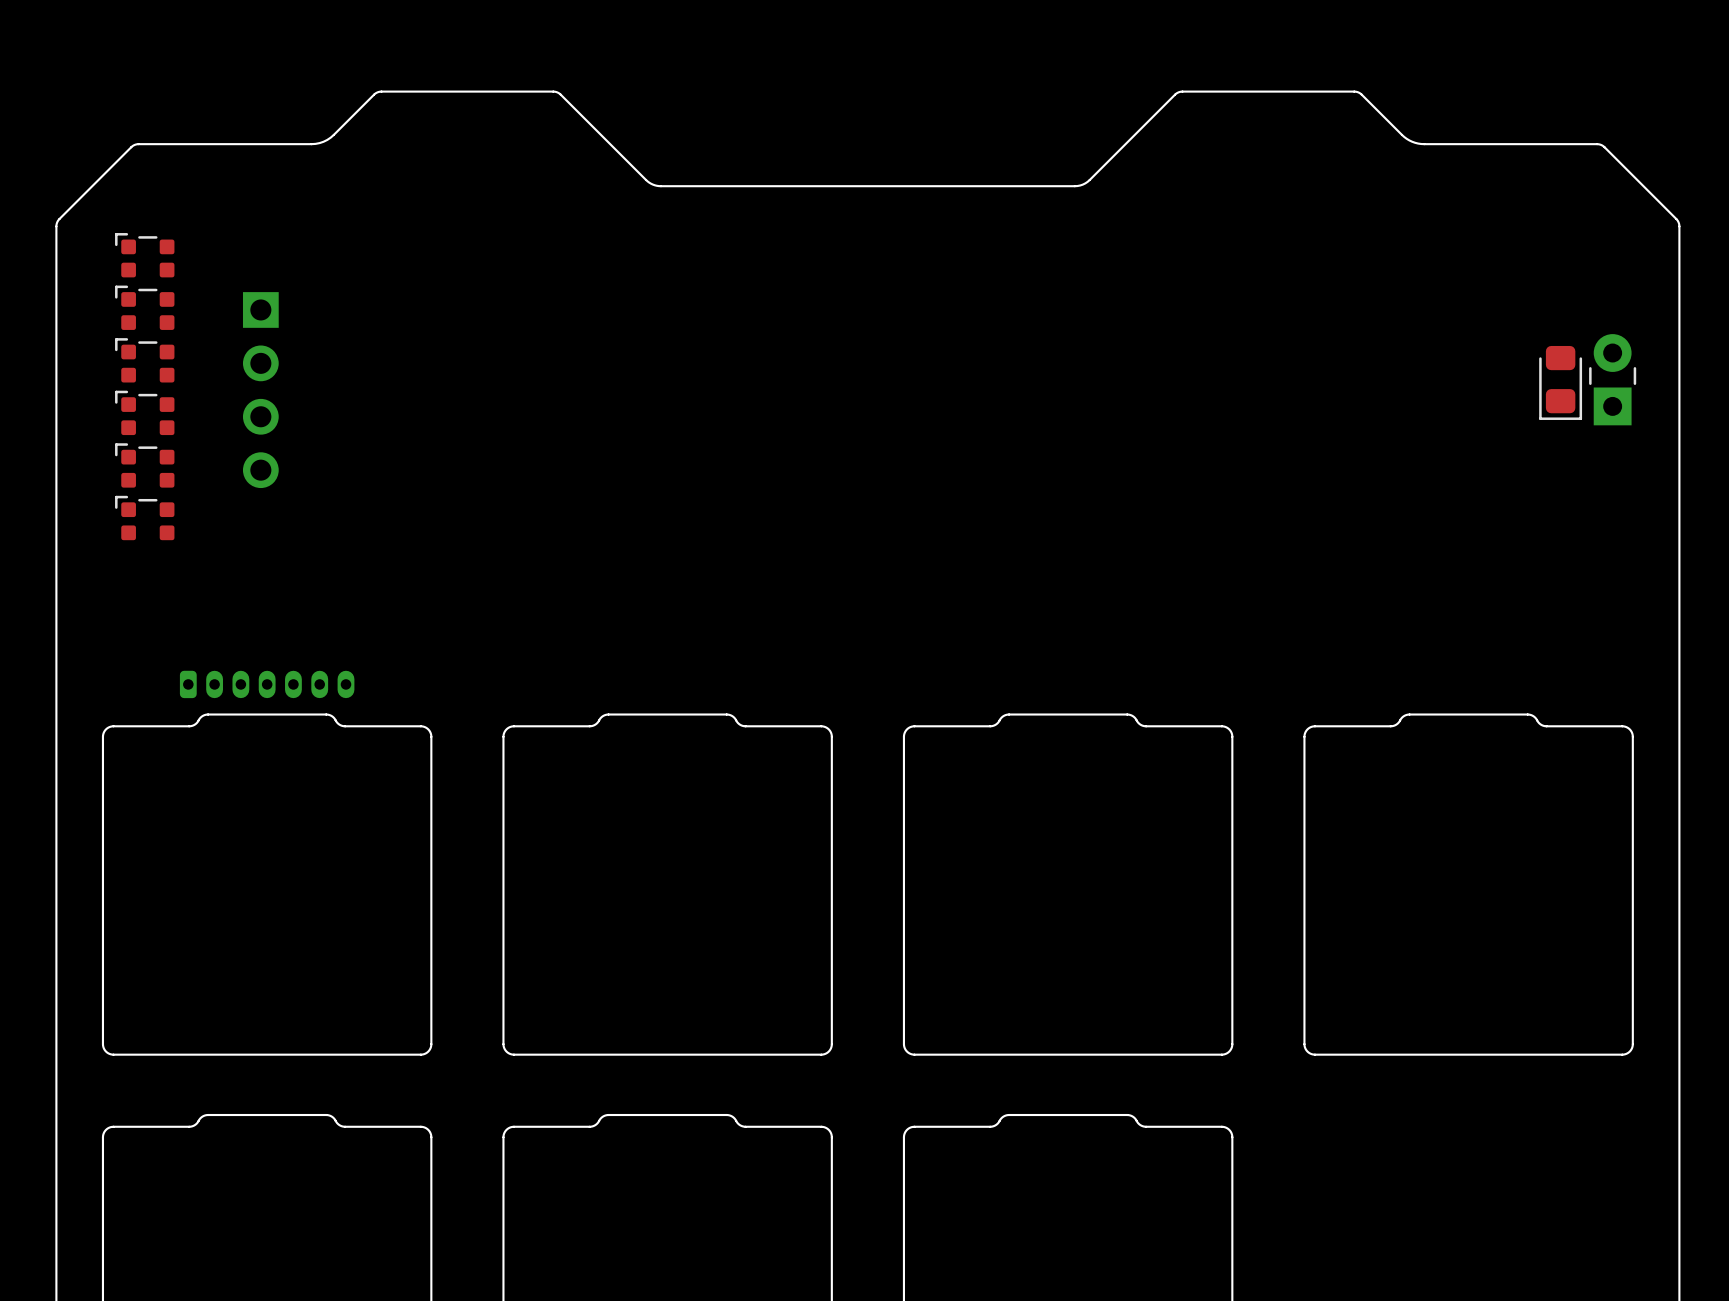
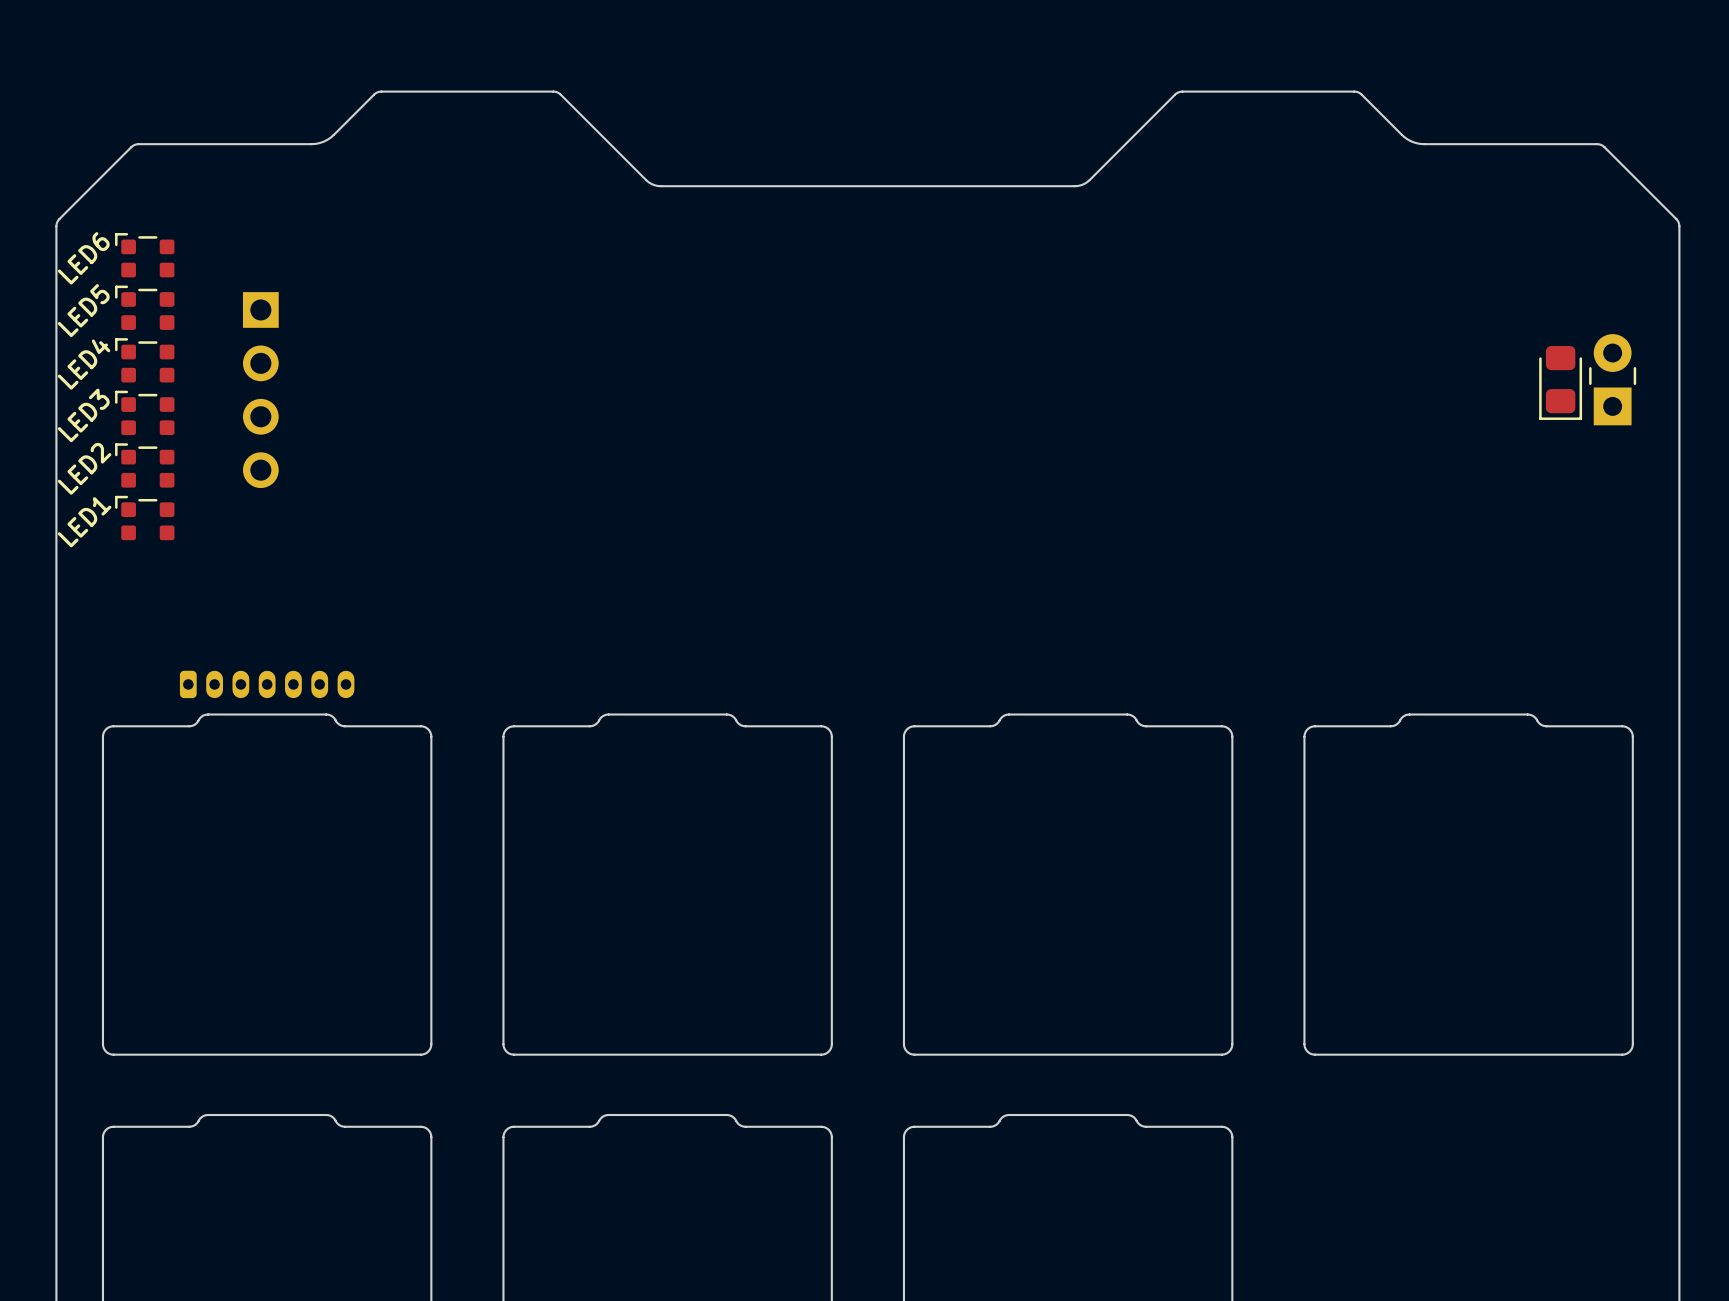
LED6 name: none -> LED6 (83, 258)
LED5 name: none -> LED5 (83, 310)
LED4 name: none -> LED4 (84, 364)
LED3 name: none -> LED3 (83, 415)
LED2 name: none -> LED2 (84, 468)
LED1 name: none -> LED1 (84, 522)

